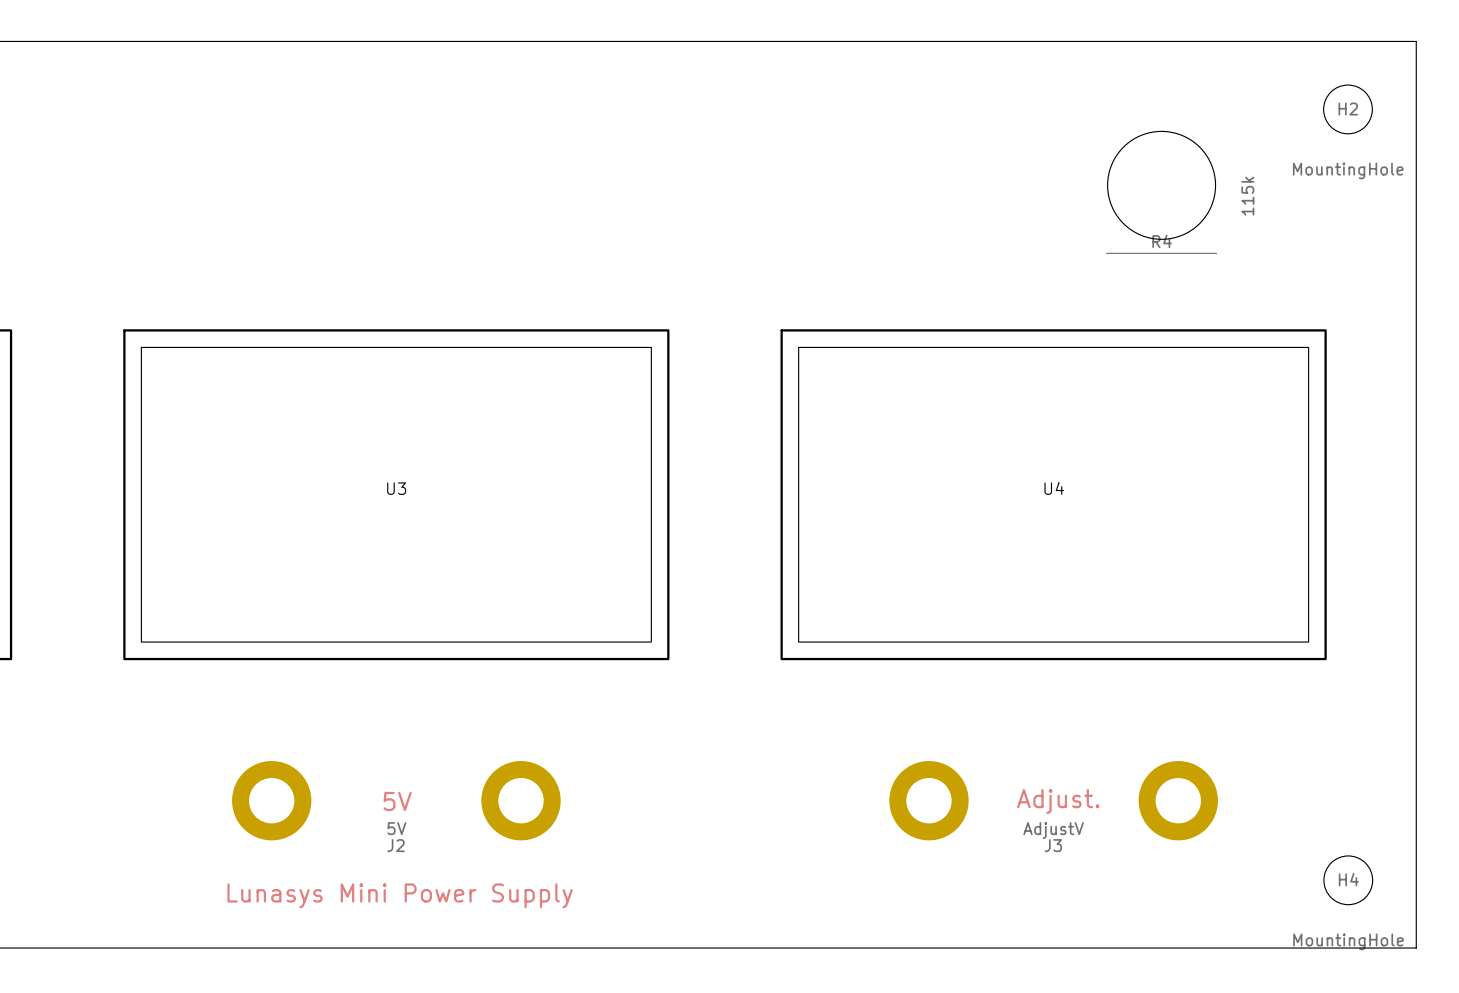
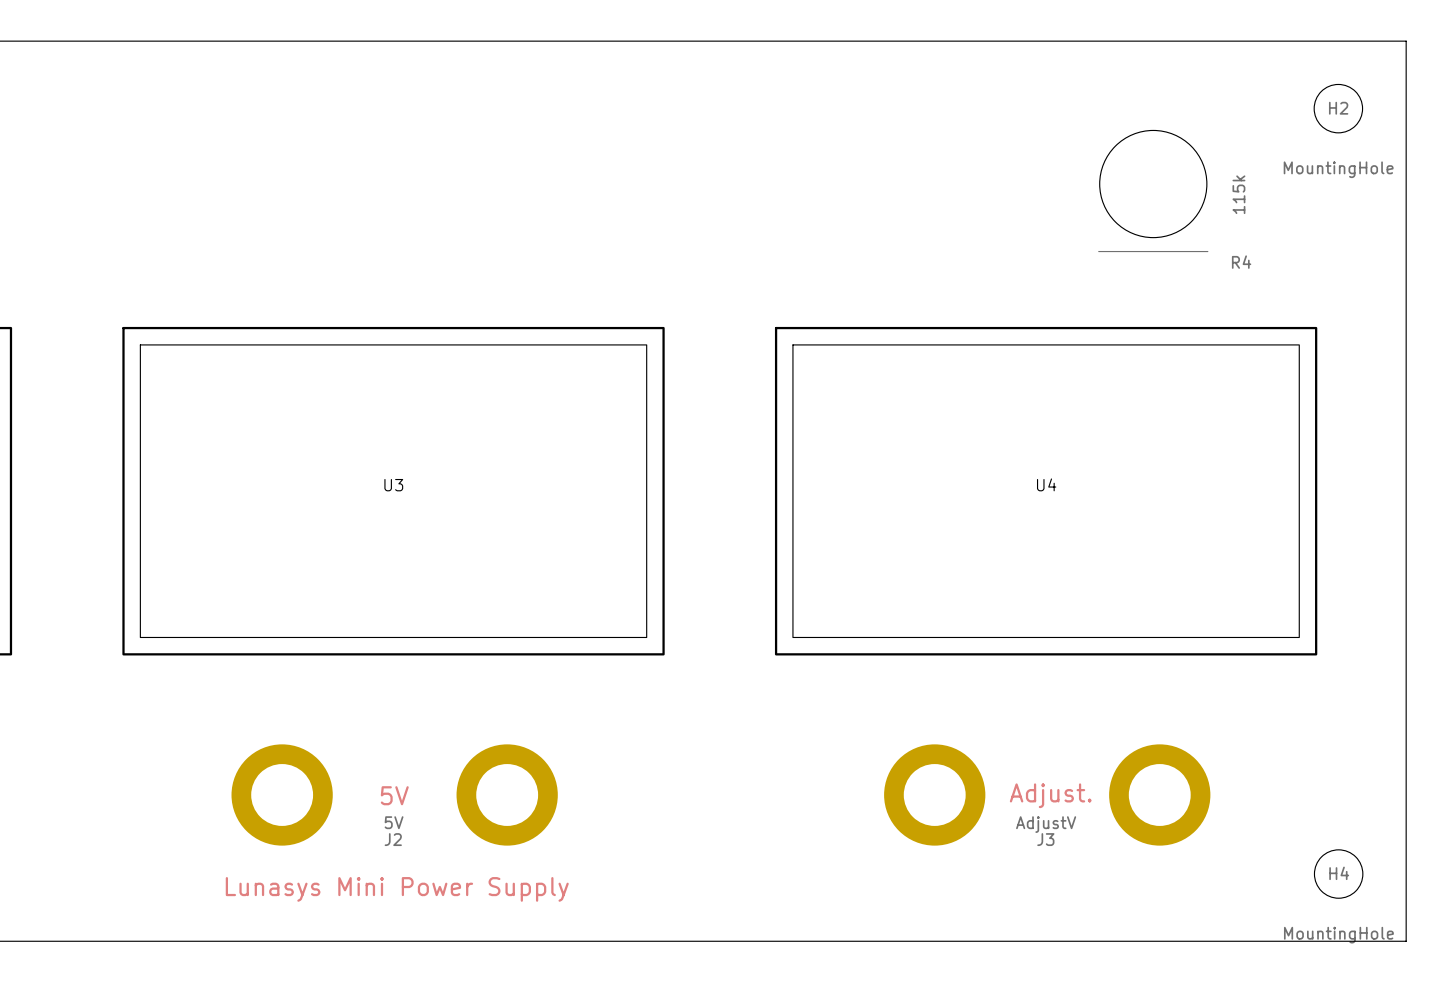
R4 name position: R4 (1162, 241) -> R4 (1241, 262)
J2 footprint: [232, 761, 561, 841] -> [231, 744, 558, 846]
J3 footprint: [889, 761, 1218, 841] -> [884, 744, 1211, 846]

